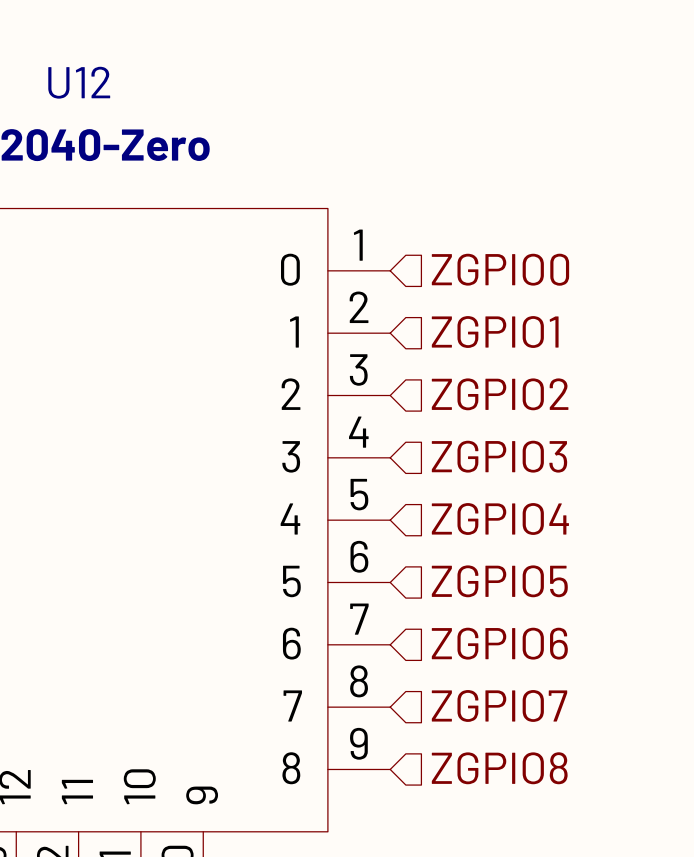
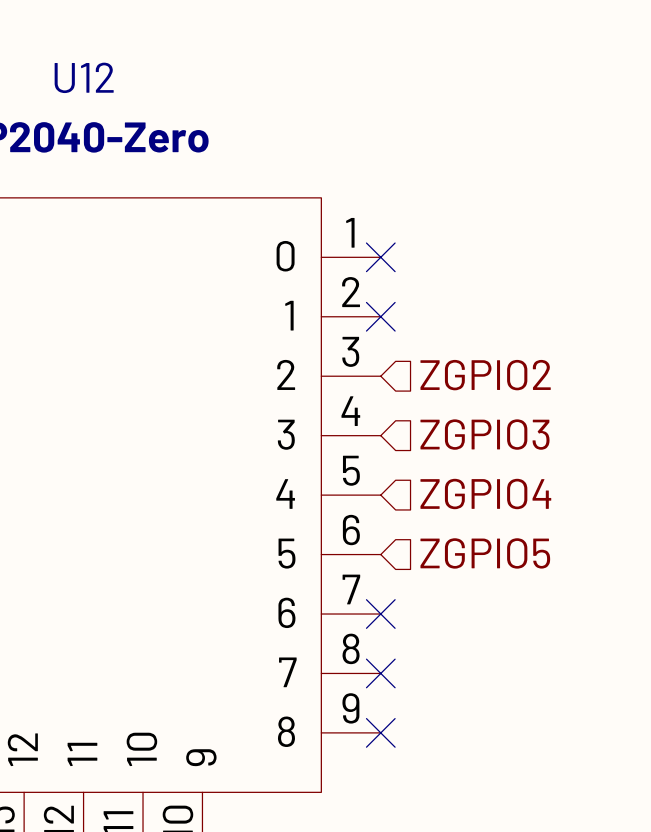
hierarchical label: ZGPIO0 (500, 269) -> none
no-connect mark: none -> (380, 257)
hierarchical label: ZGPIO1 (495, 332) -> none
no-connect mark: none -> (380, 316)
hierarchical label: ZGPIO6 (499, 643) -> none
no-connect mark: none -> (380, 614)
hierarchical label: ZGPIO7 (499, 705) -> none
no-connect mark: none -> (380, 673)
hierarchical label: ZGPIO8 (499, 768) -> none
no-connect mark: none -> (380, 732)

